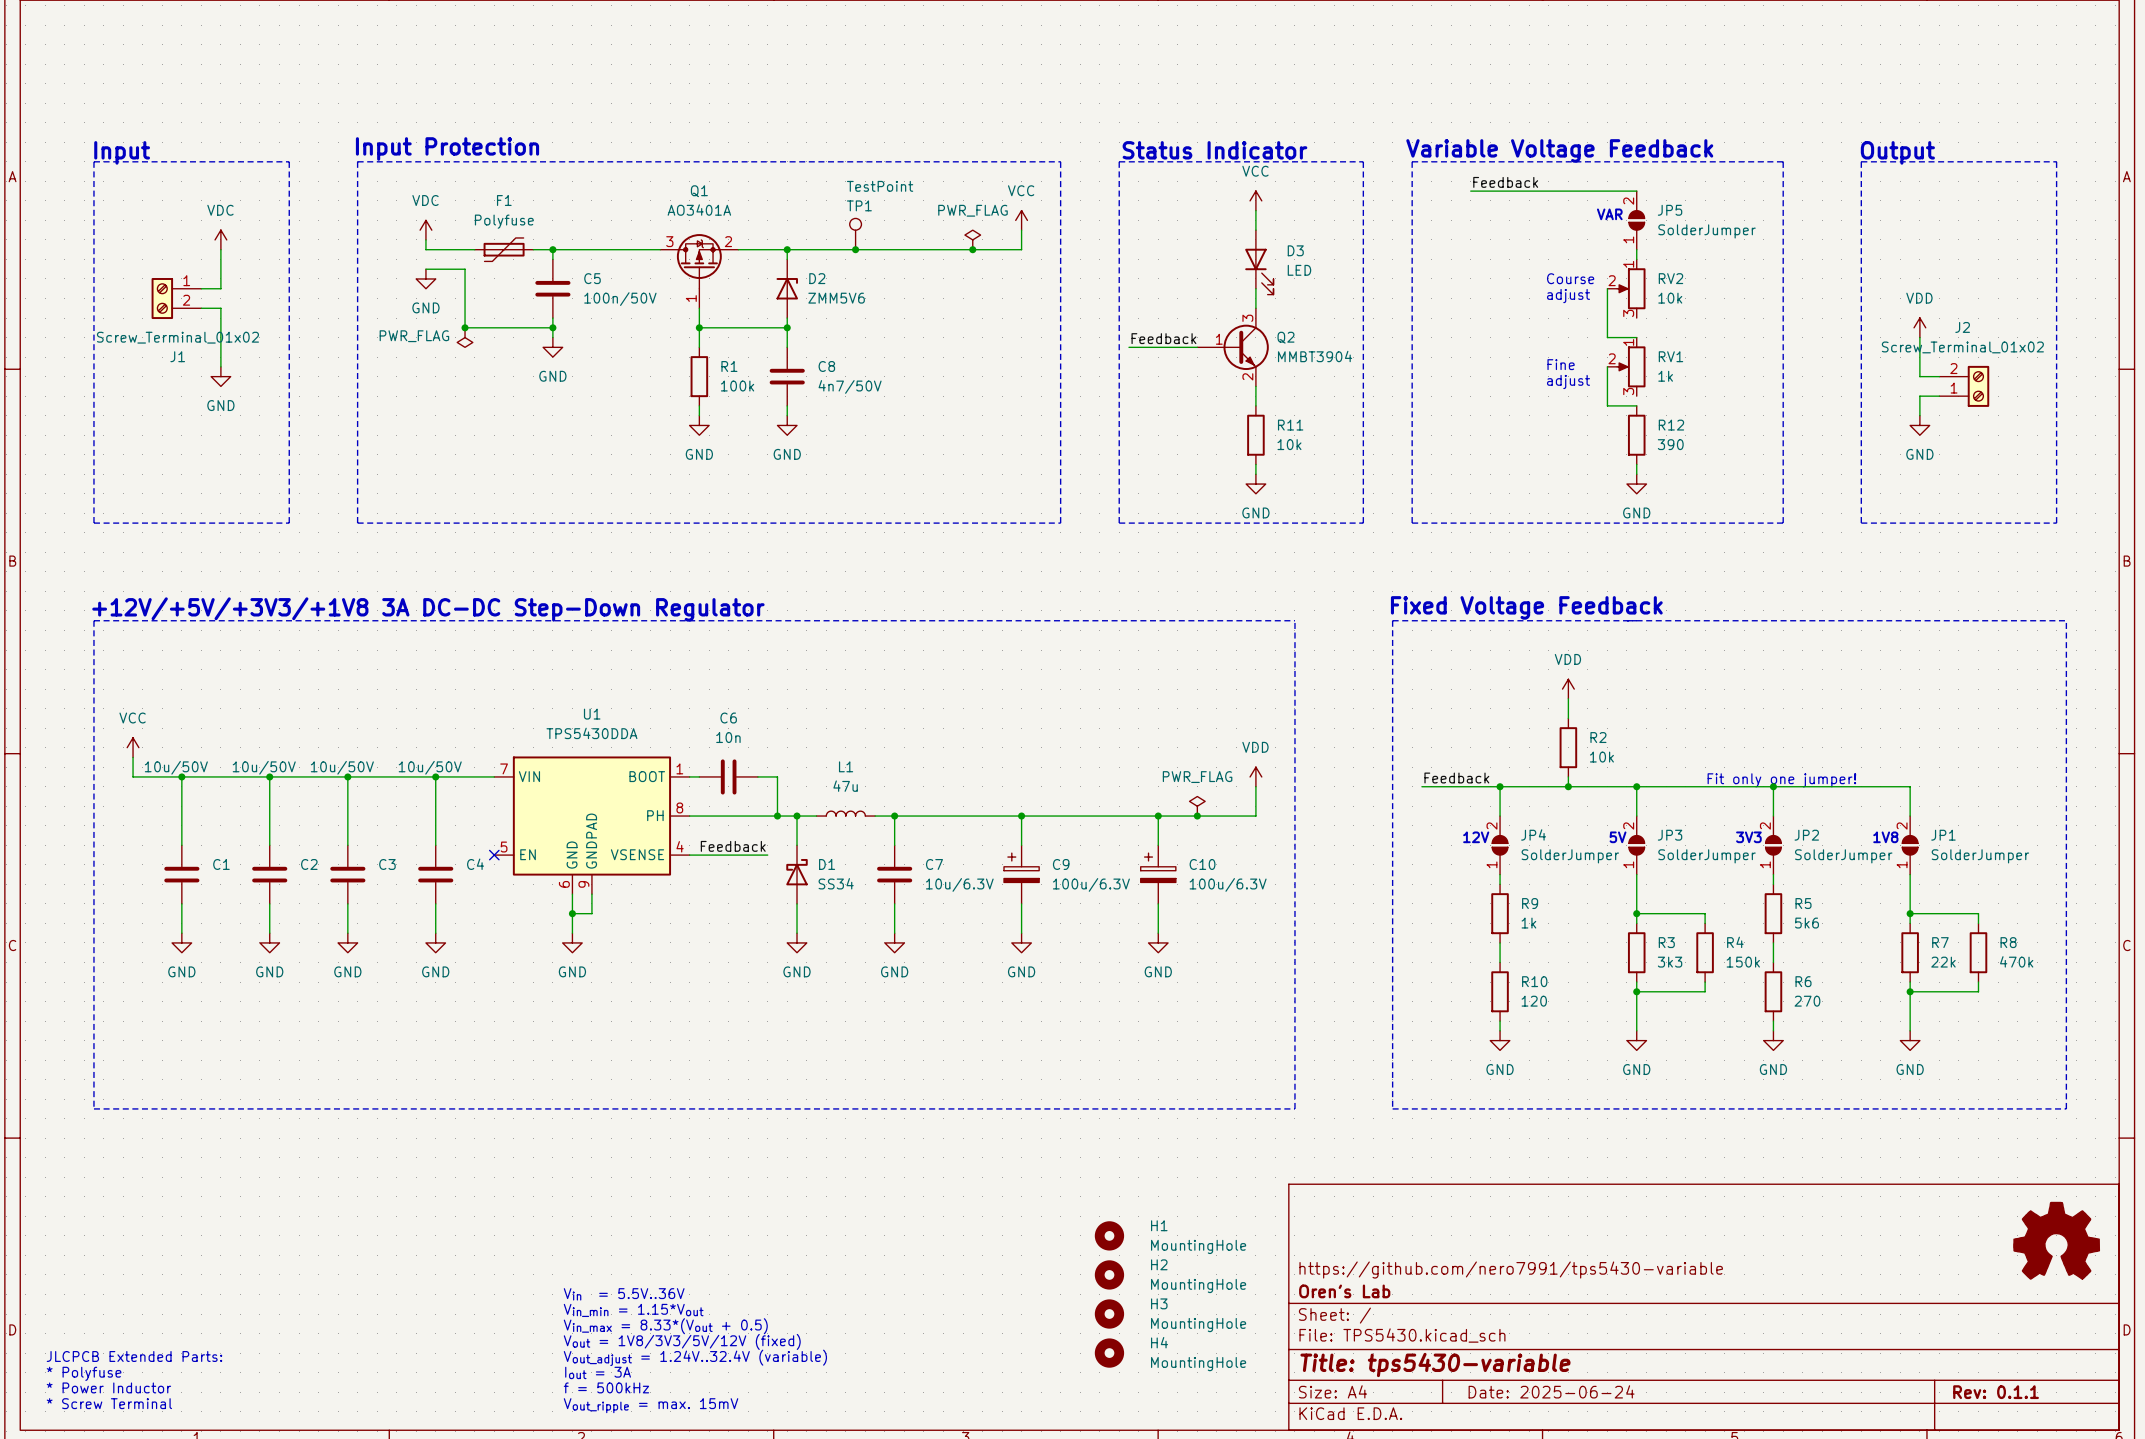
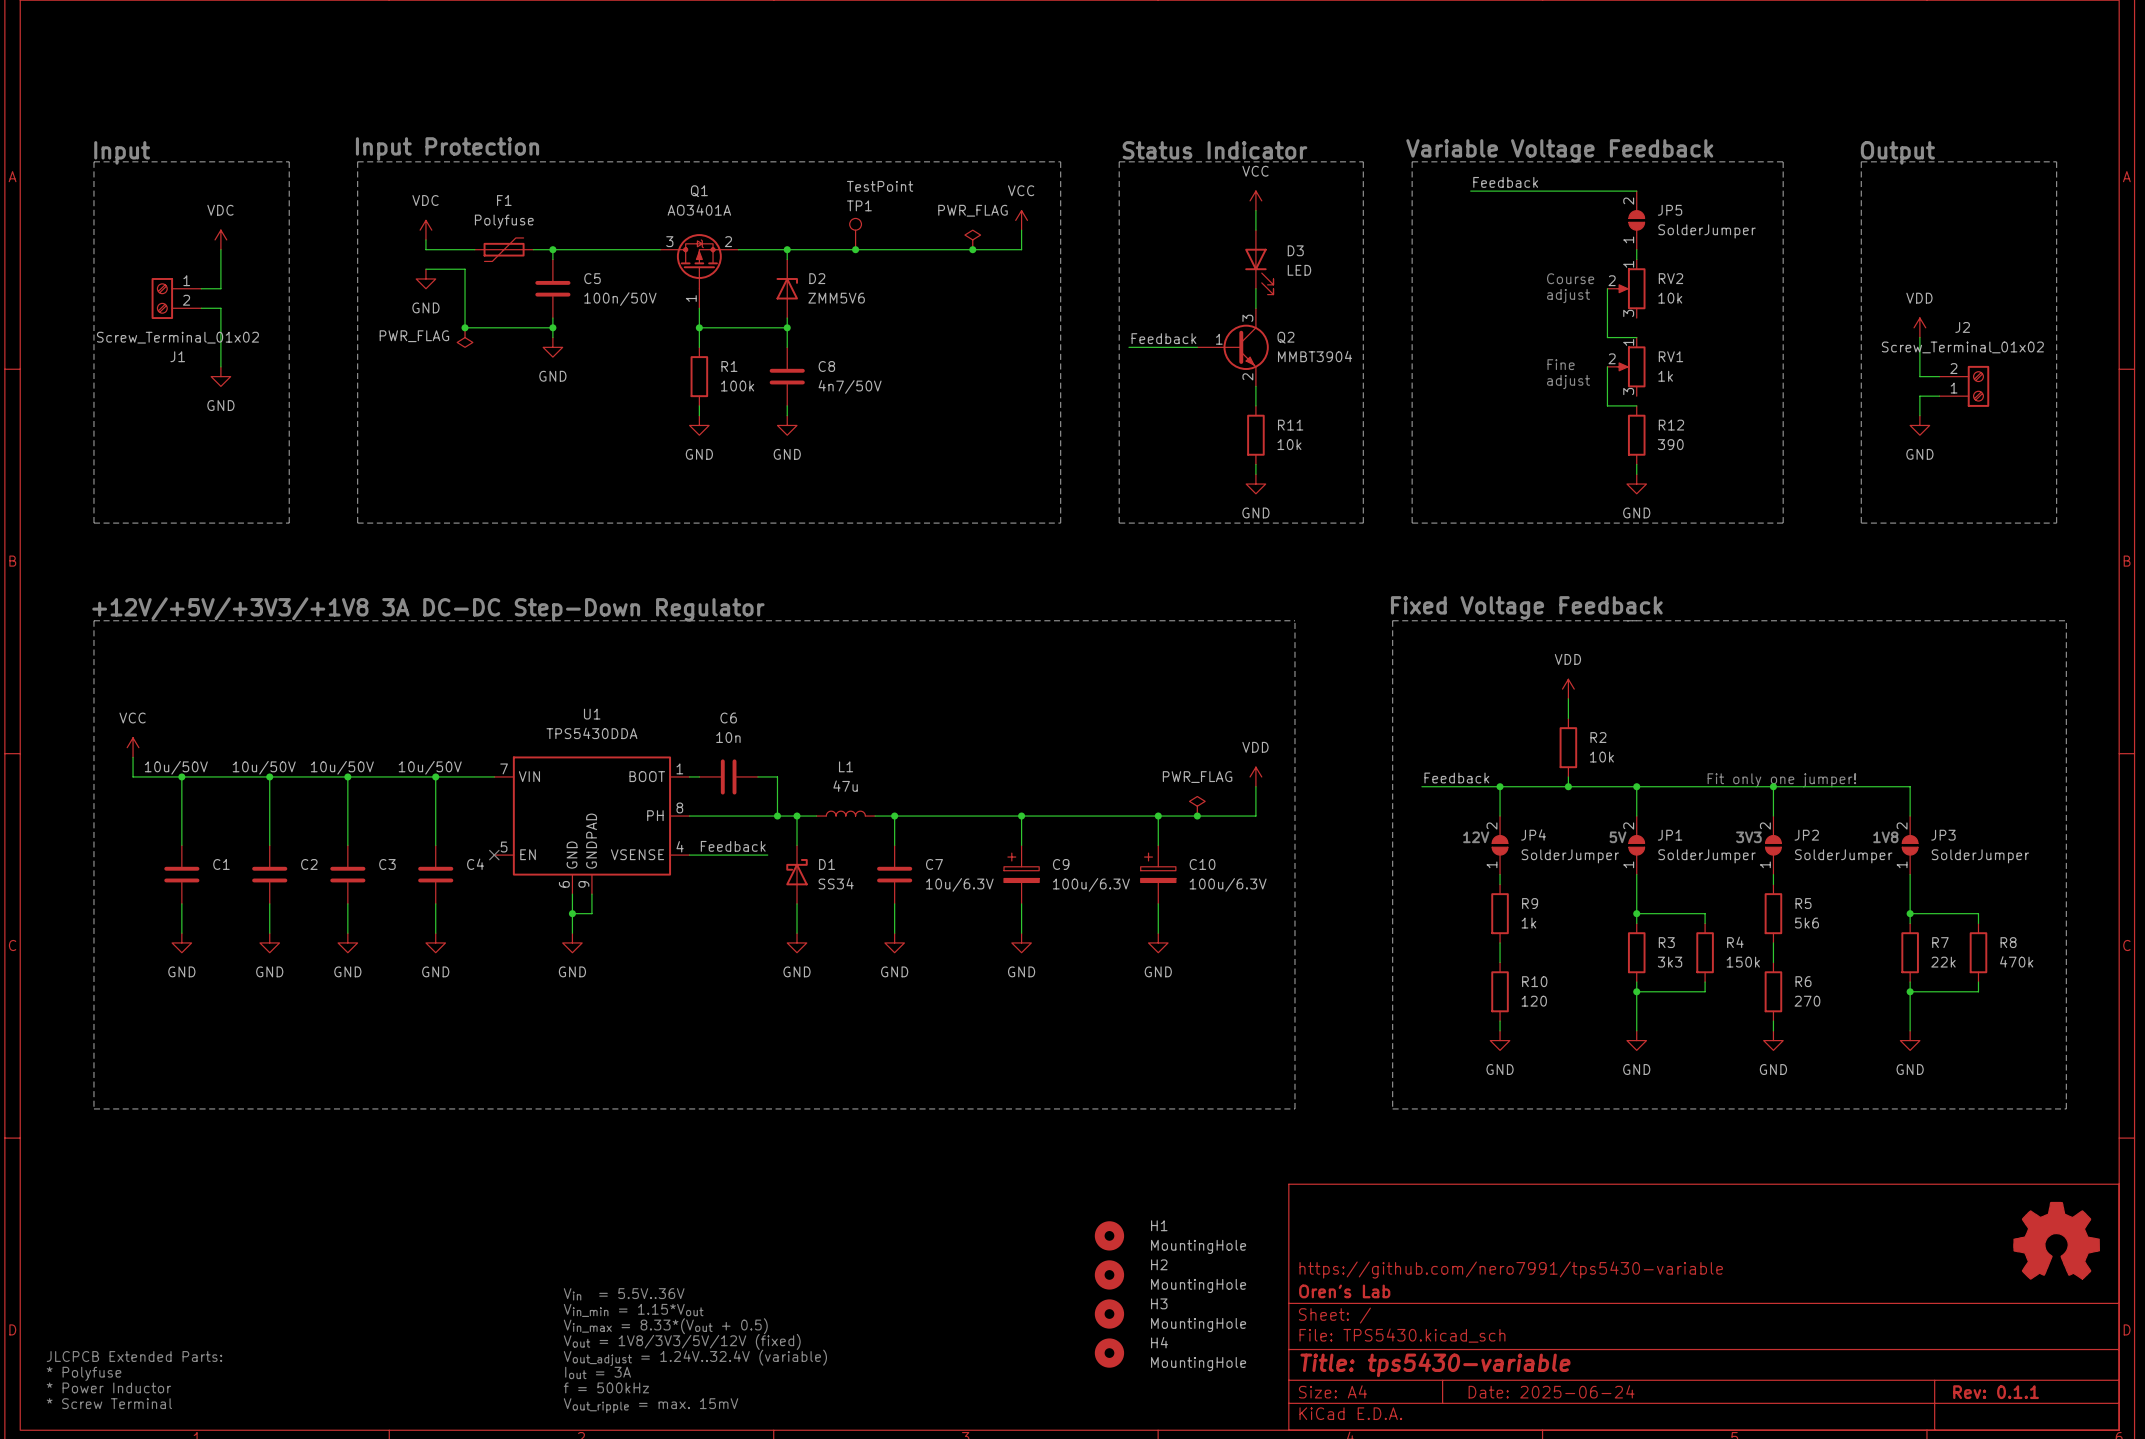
text: VAR (1609, 214) -> none
JP3 name: JP3 (1670, 835) -> JP1 (1670, 835)
JP1 name: JP1 (1943, 835) -> JP3 (1943, 835)

